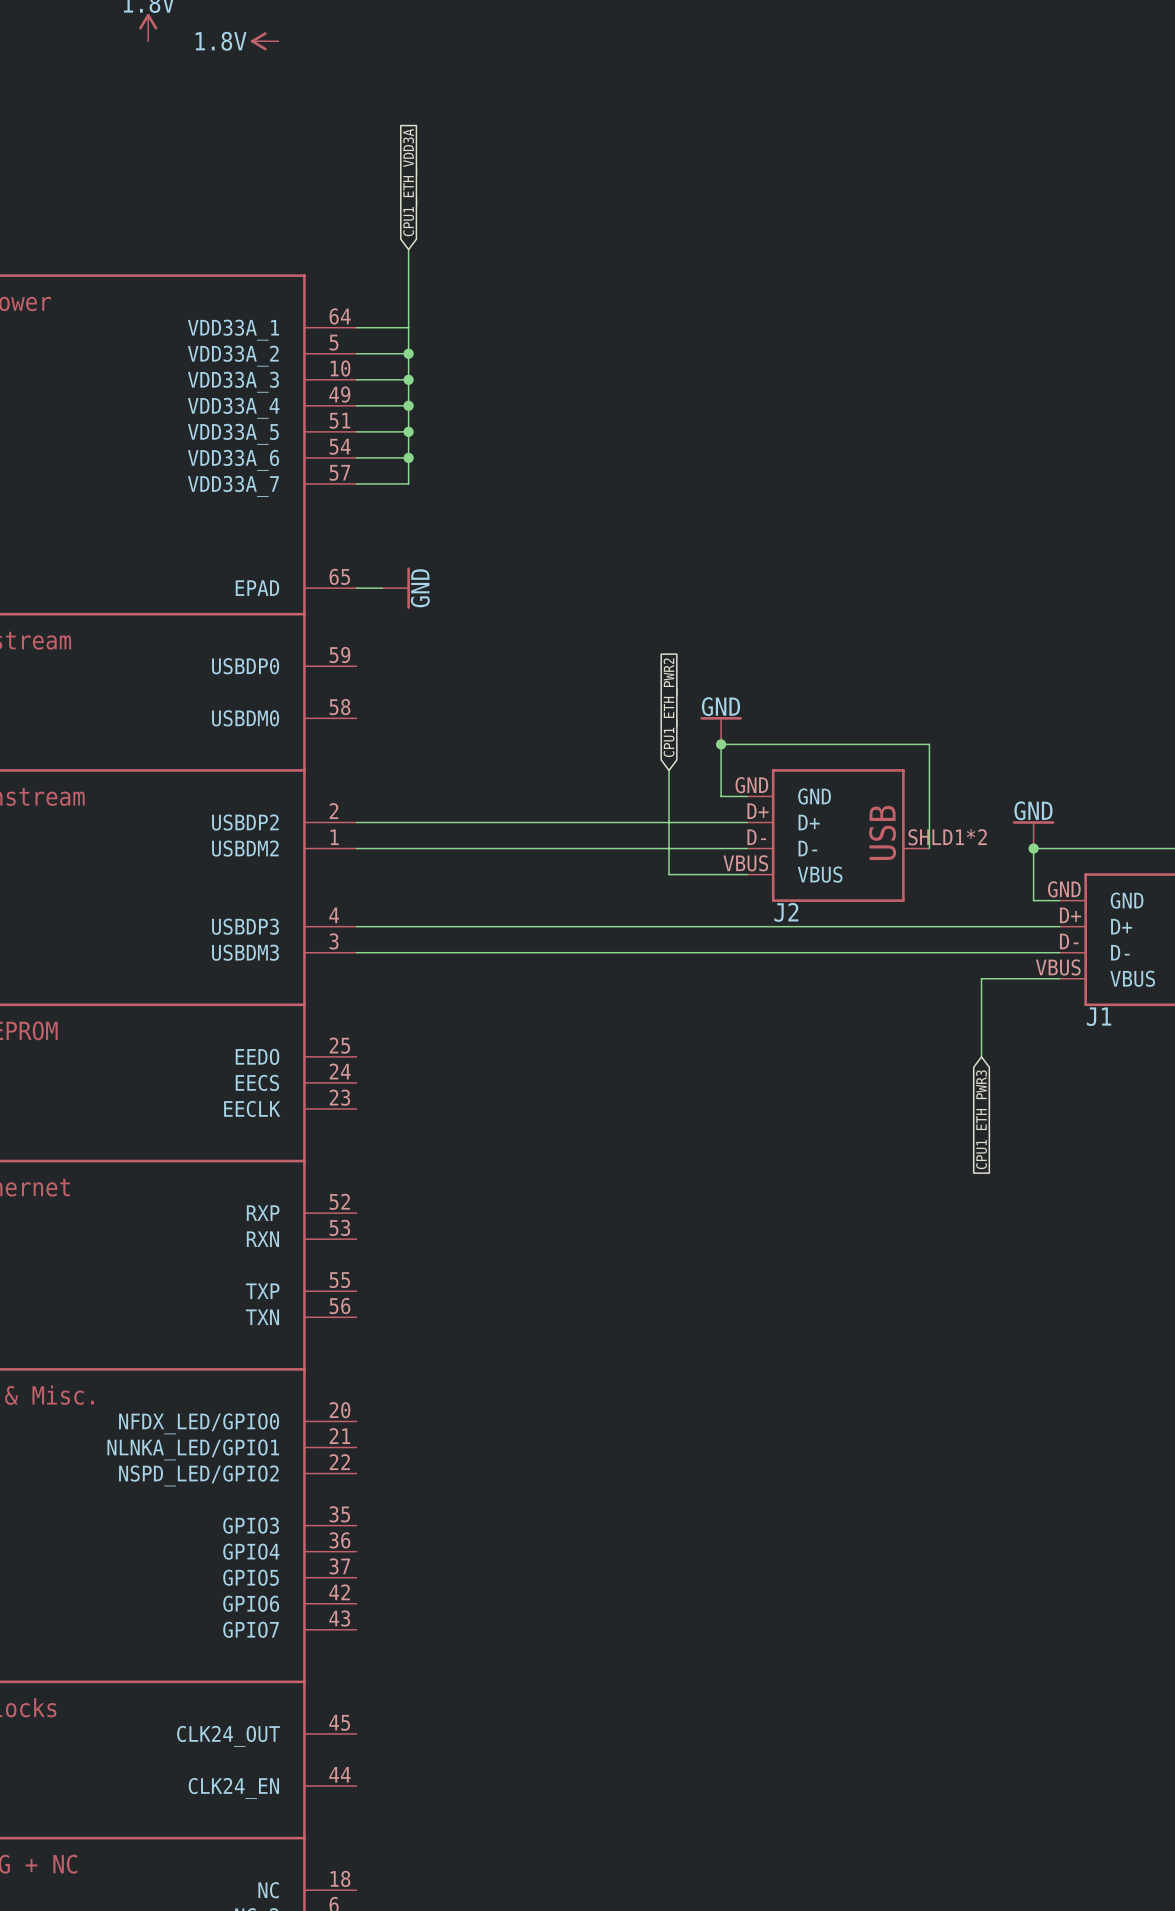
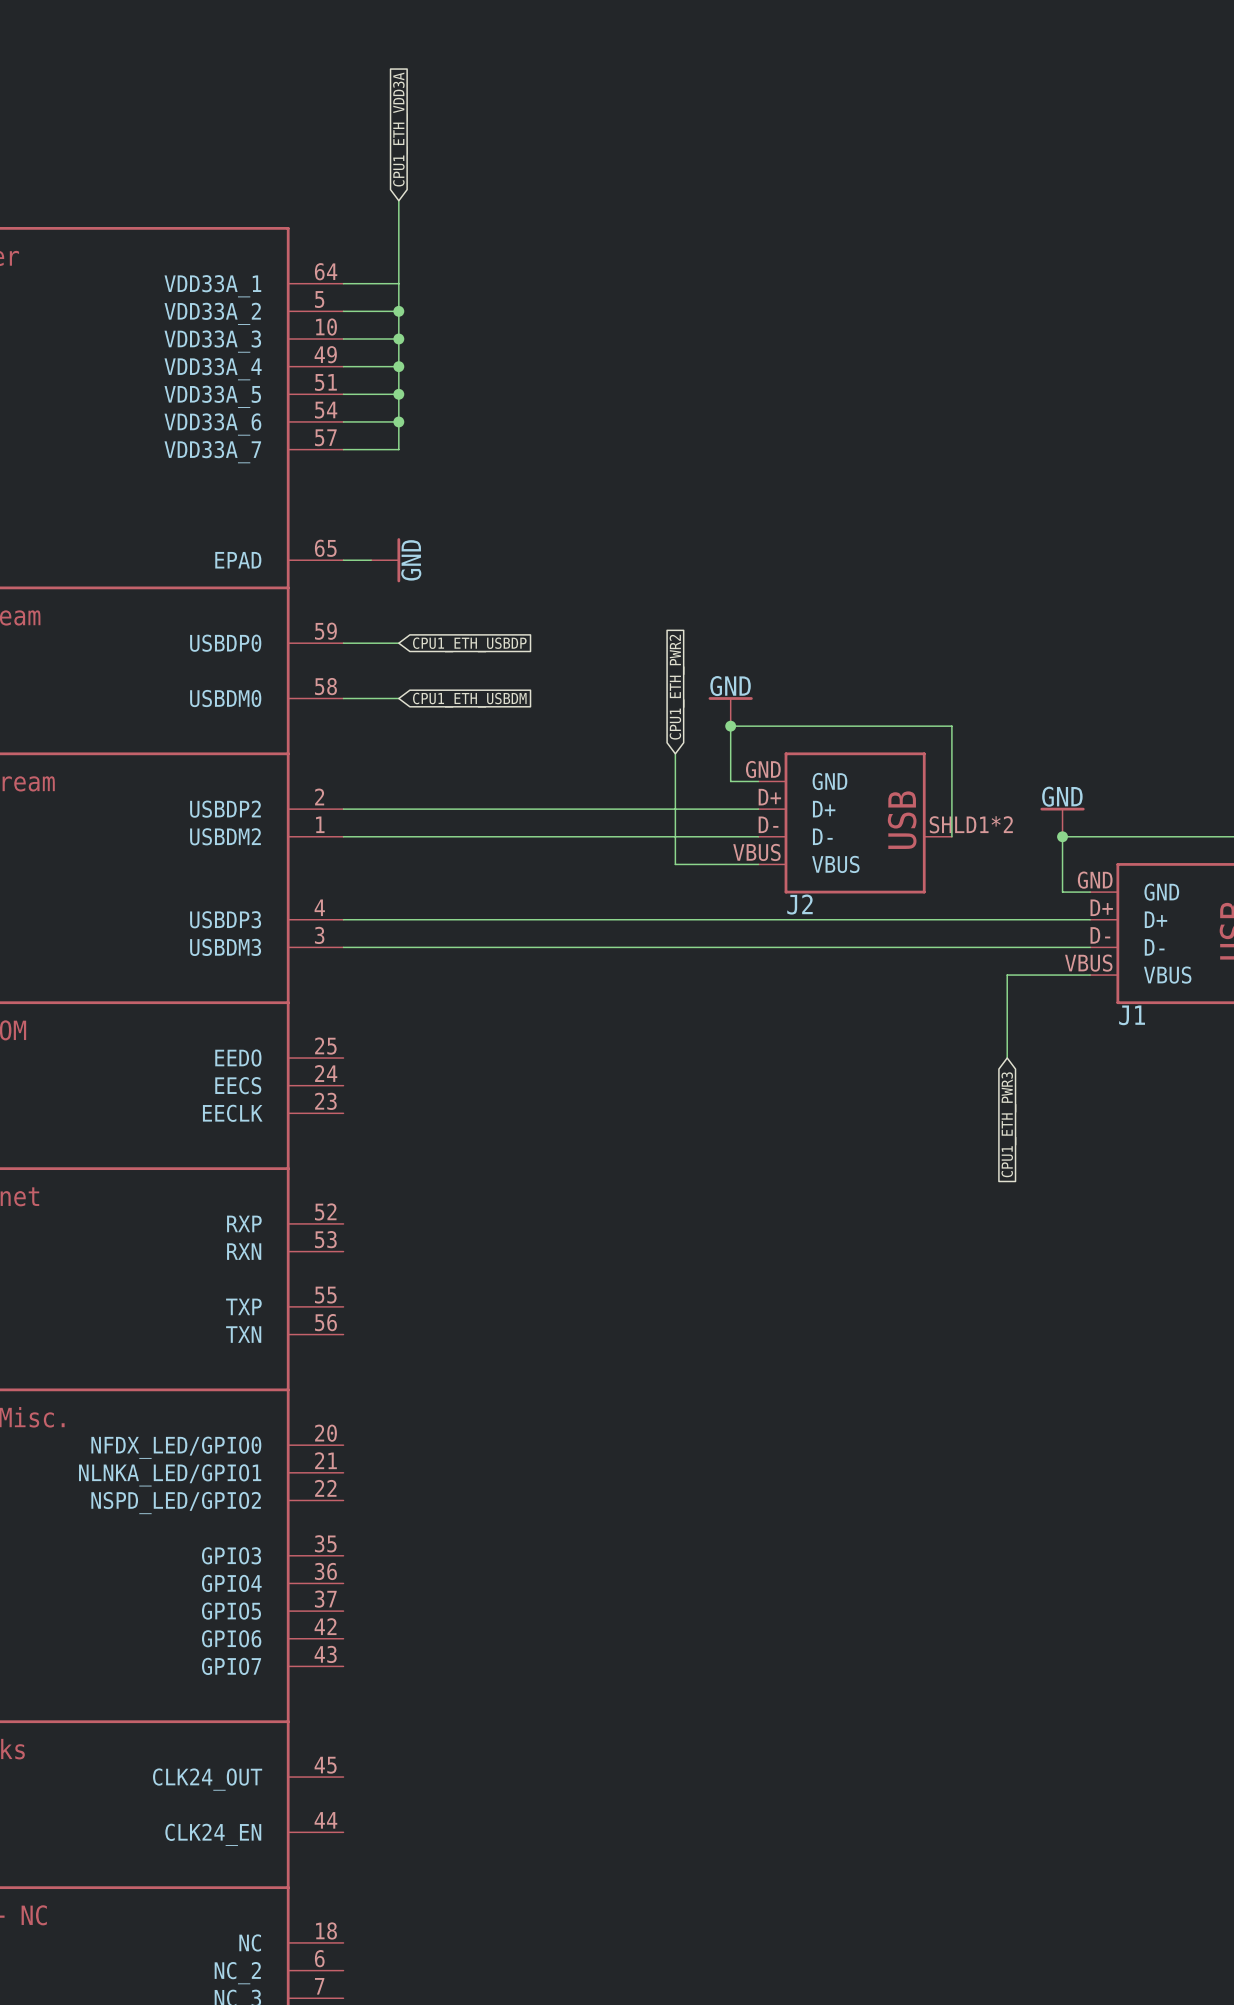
wire: none -> (343, 643) (398, 643)
global label: none -> CPU1_ETH_USBDP (469, 644)
wire: none -> (343, 698) (398, 698)
global label: none -> CPU1_ETH_USBDM (469, 700)

